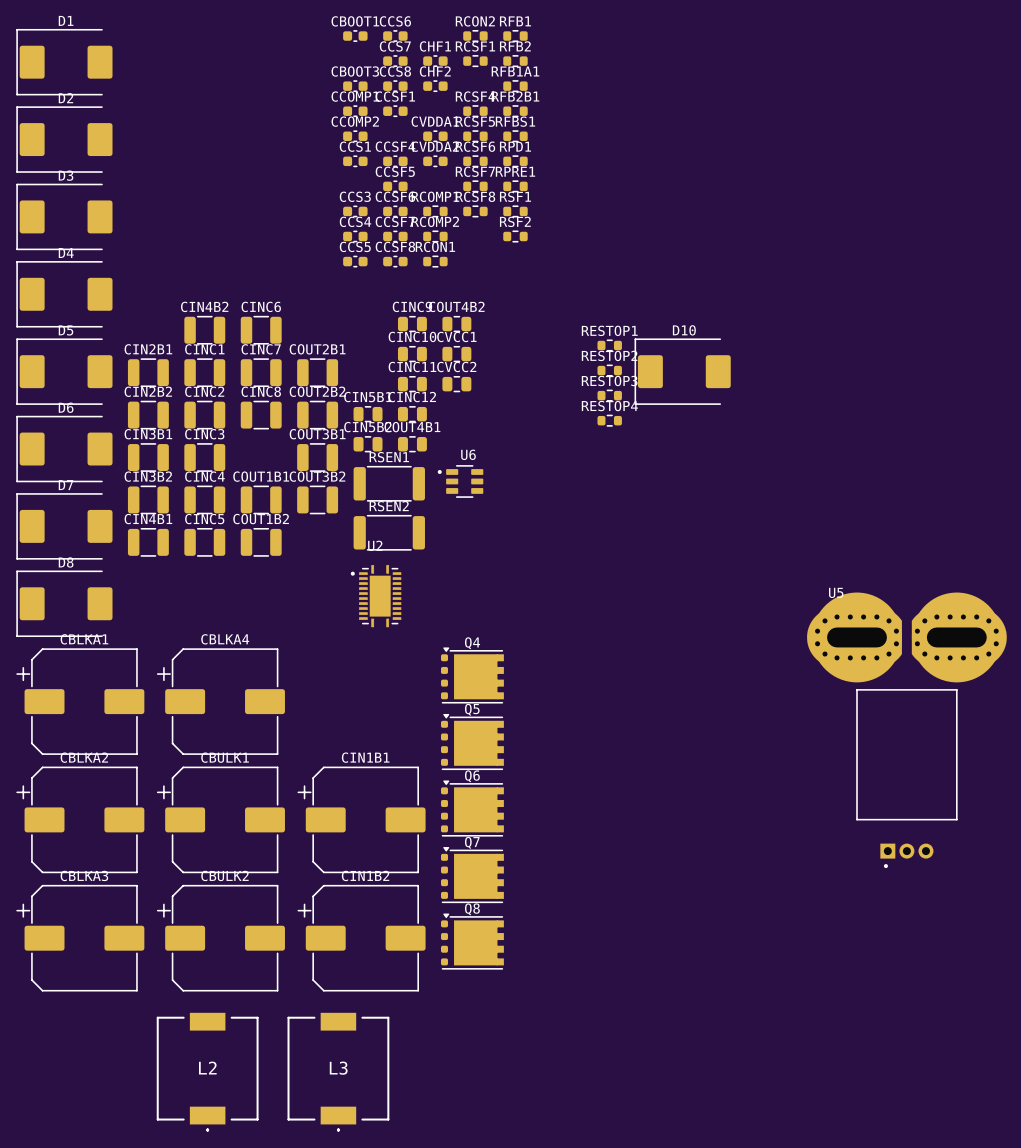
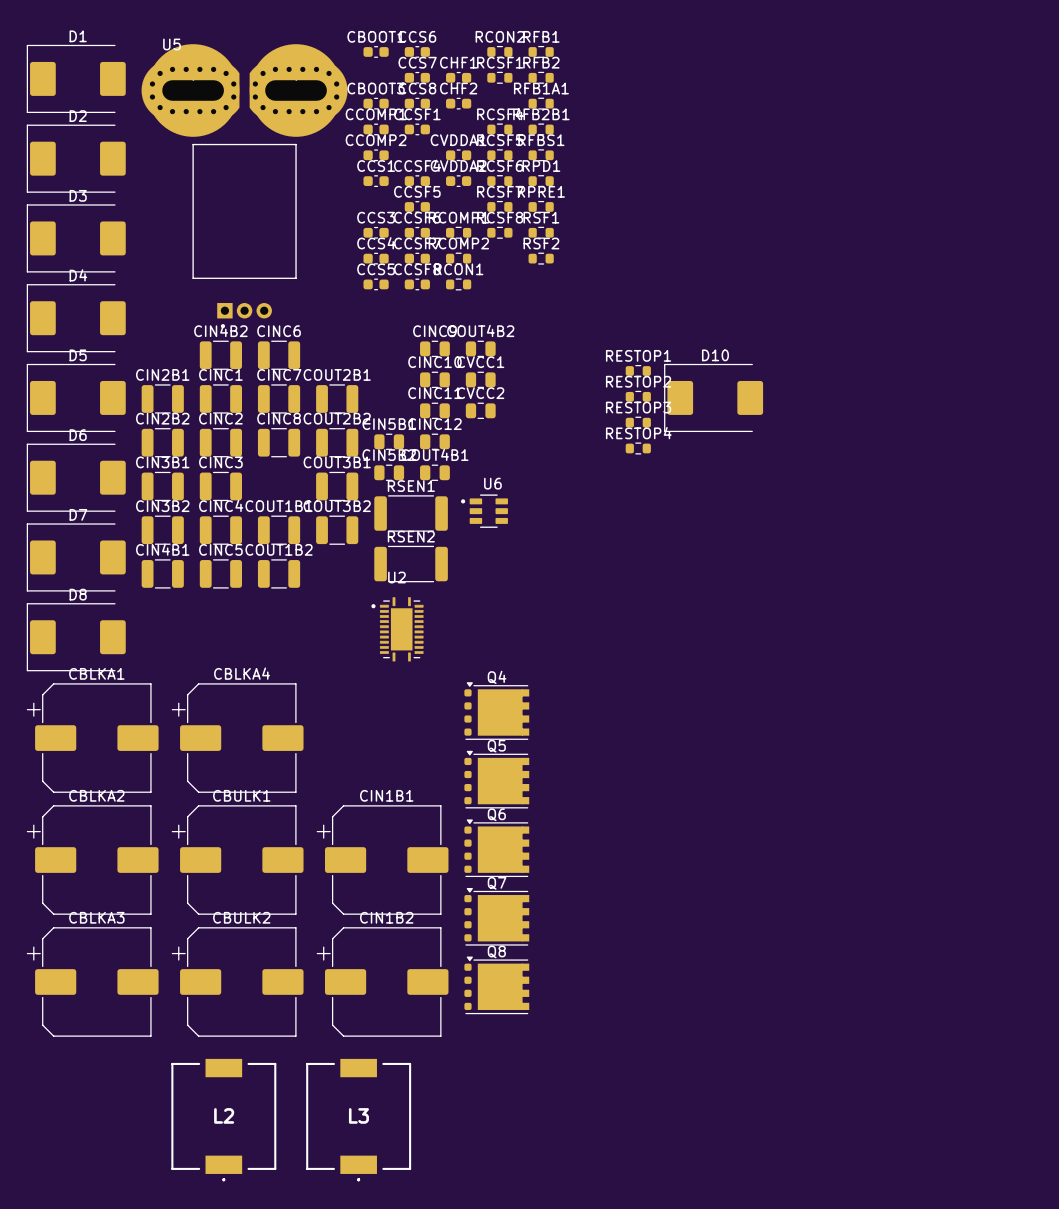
U5 footprint: [807, 592, 1007, 869] -> [141, 44, 348, 329]

